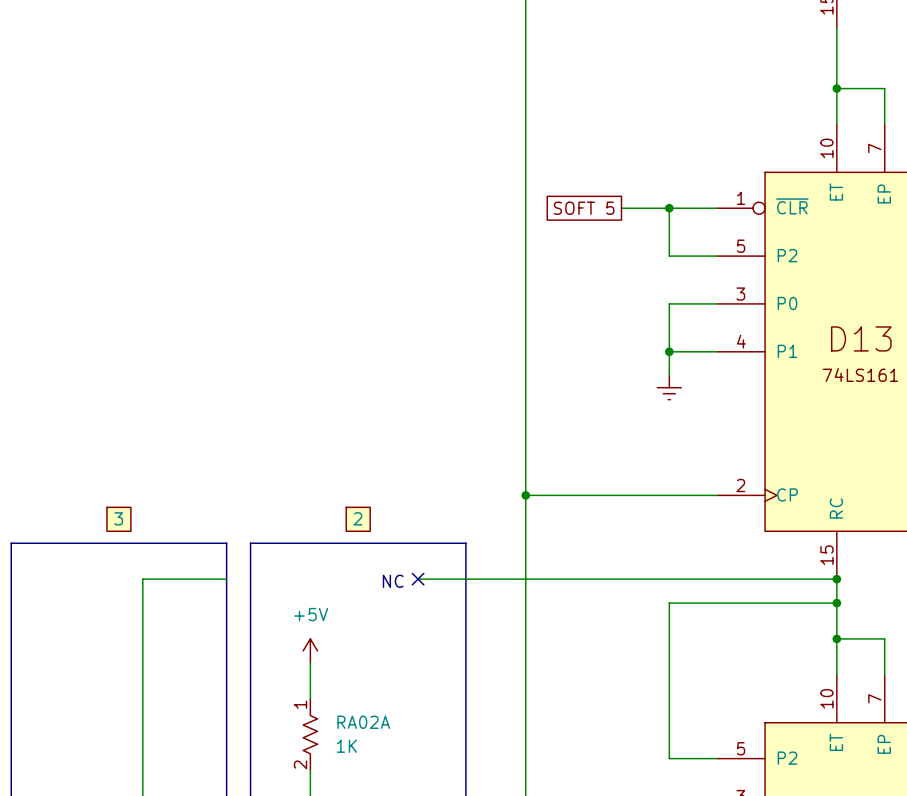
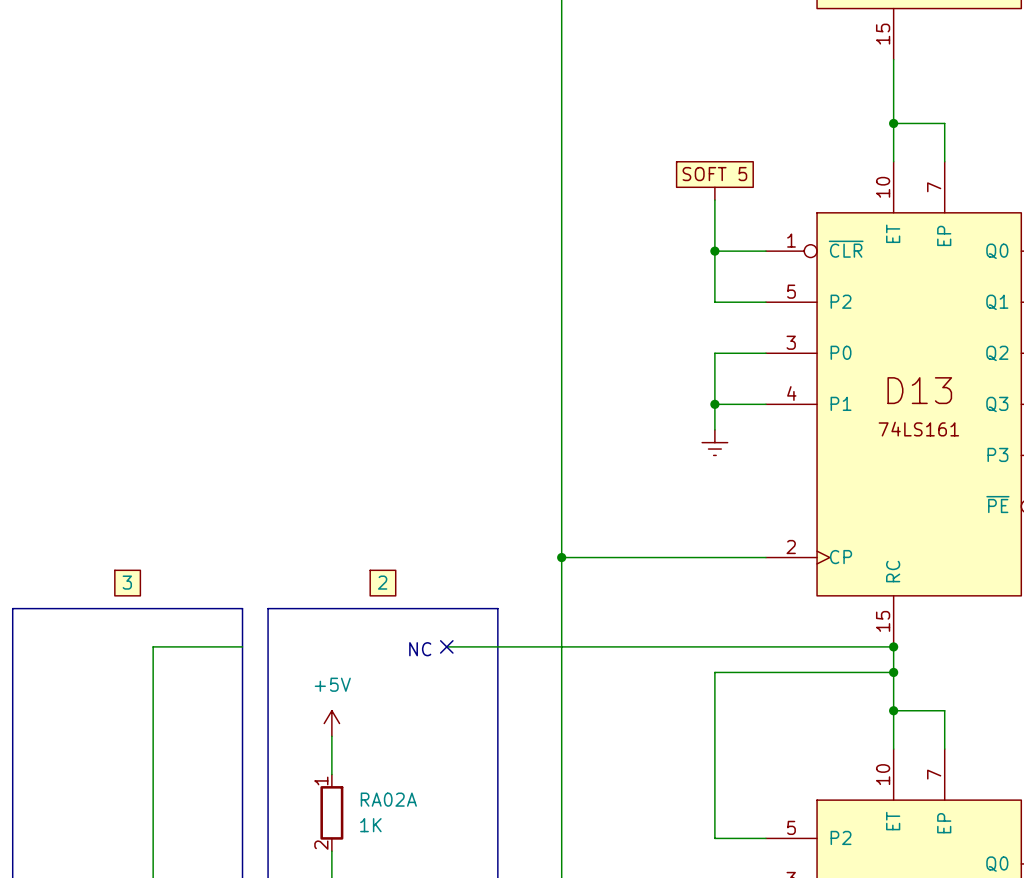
part: none -> (714, 180)
global label: SOFT 5 (584, 208) -> none
wire: (621, 208) (669, 208) -> (714, 200) (714, 251)
RA02A symbol: [303, 698, 318, 771] -> [320, 774, 344, 852]

